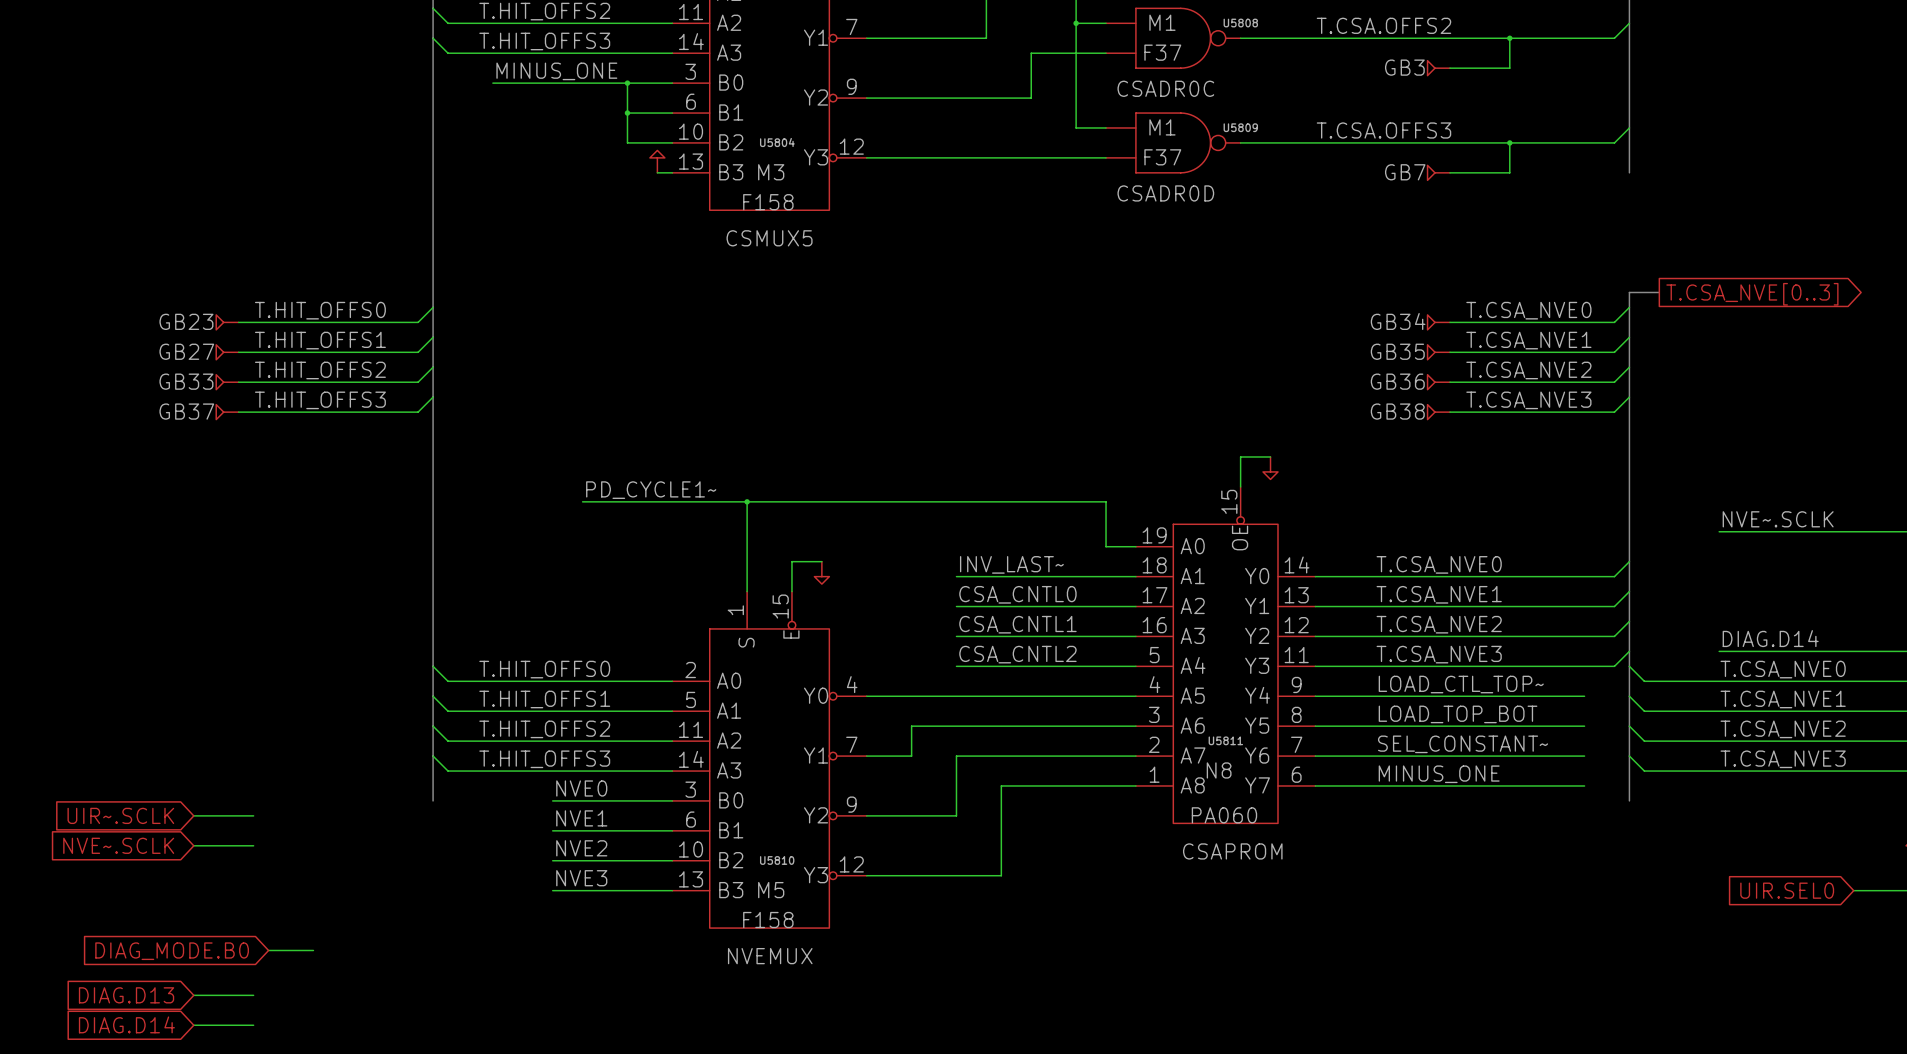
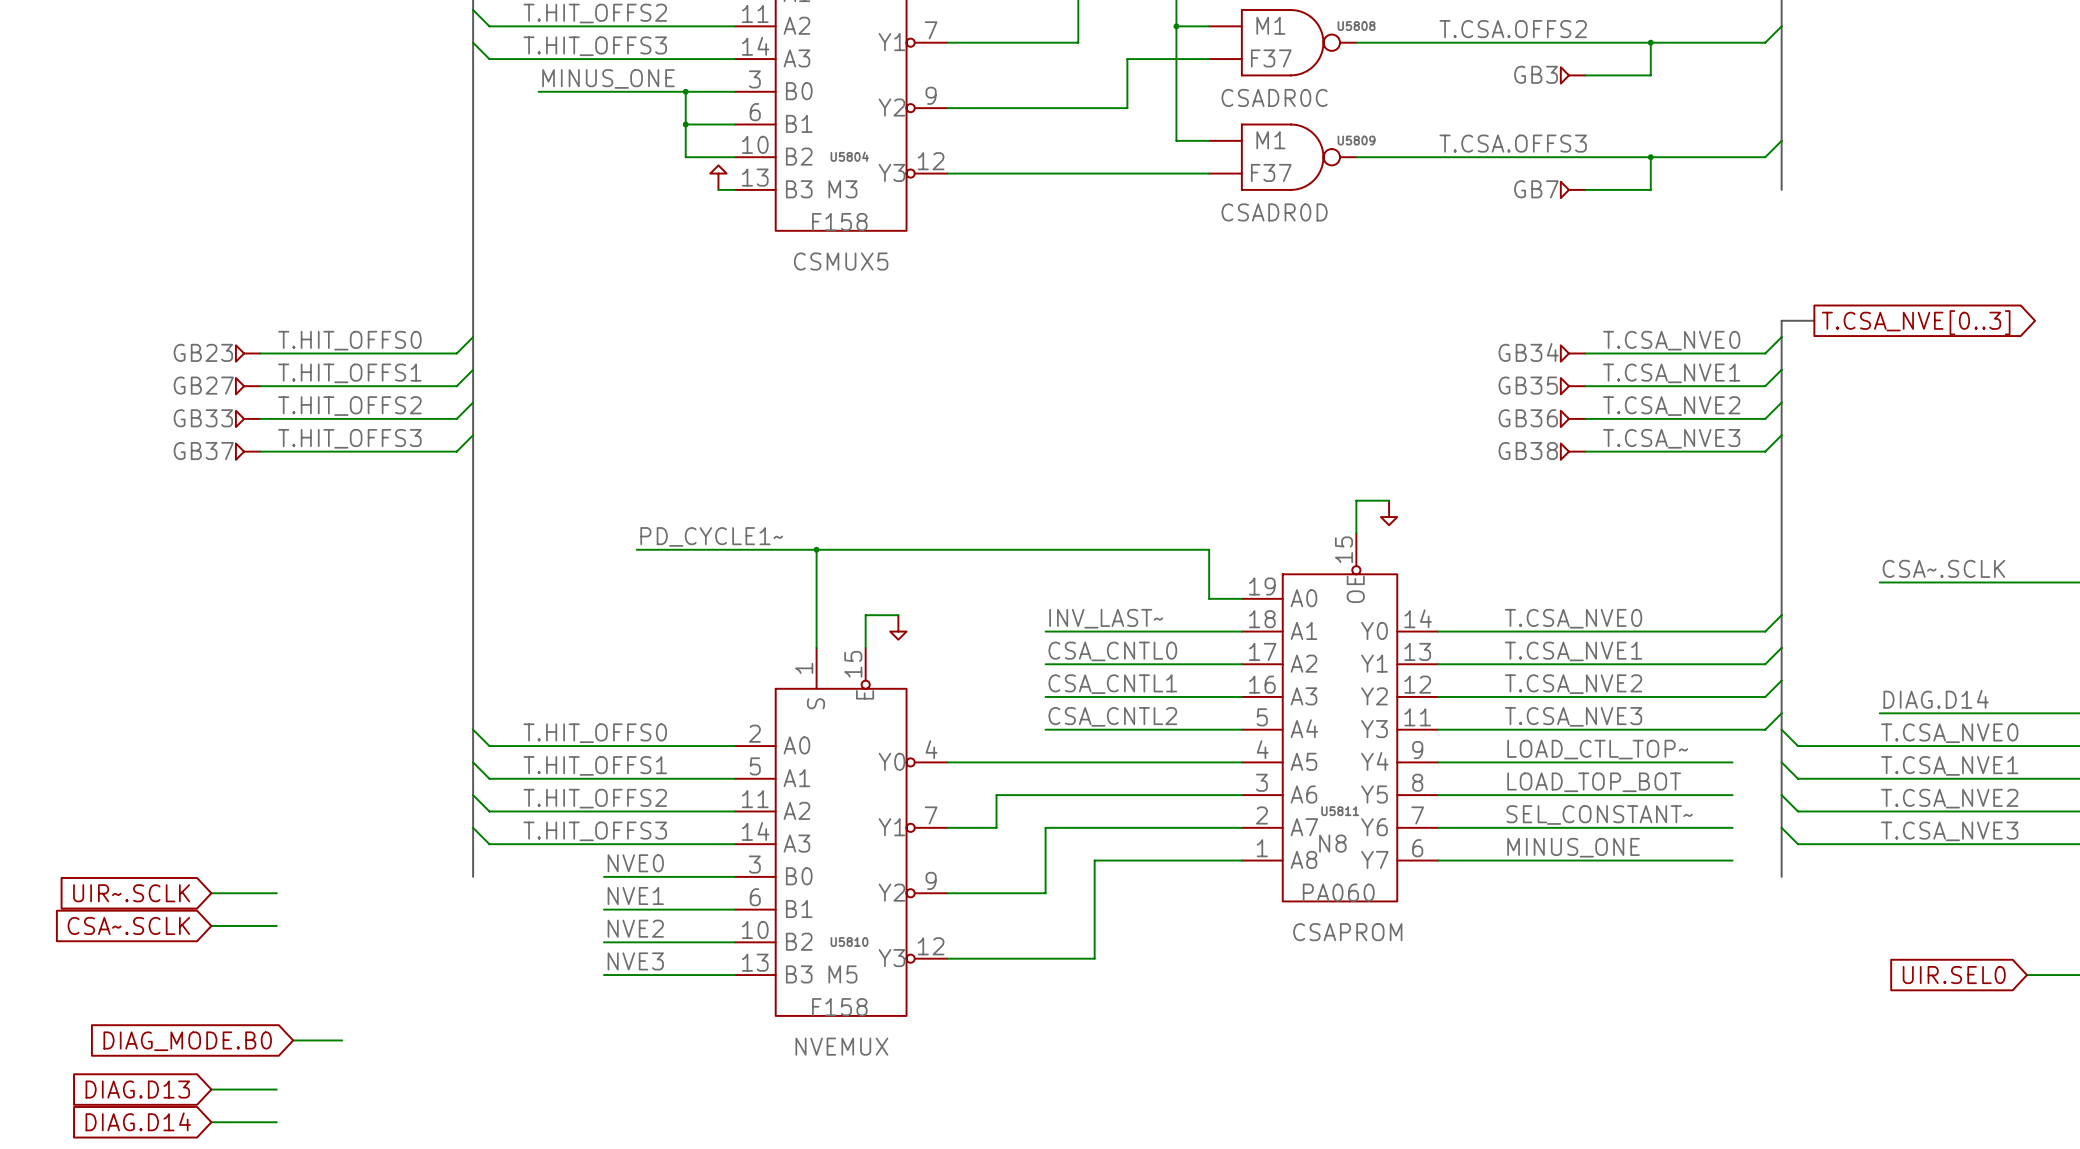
label: NVE~.SCLK (1778, 519) -> CSA~.SCLK (1943, 568)
global label: NVE~.SCLK (118, 845) -> CSA~.SCLK (128, 925)

